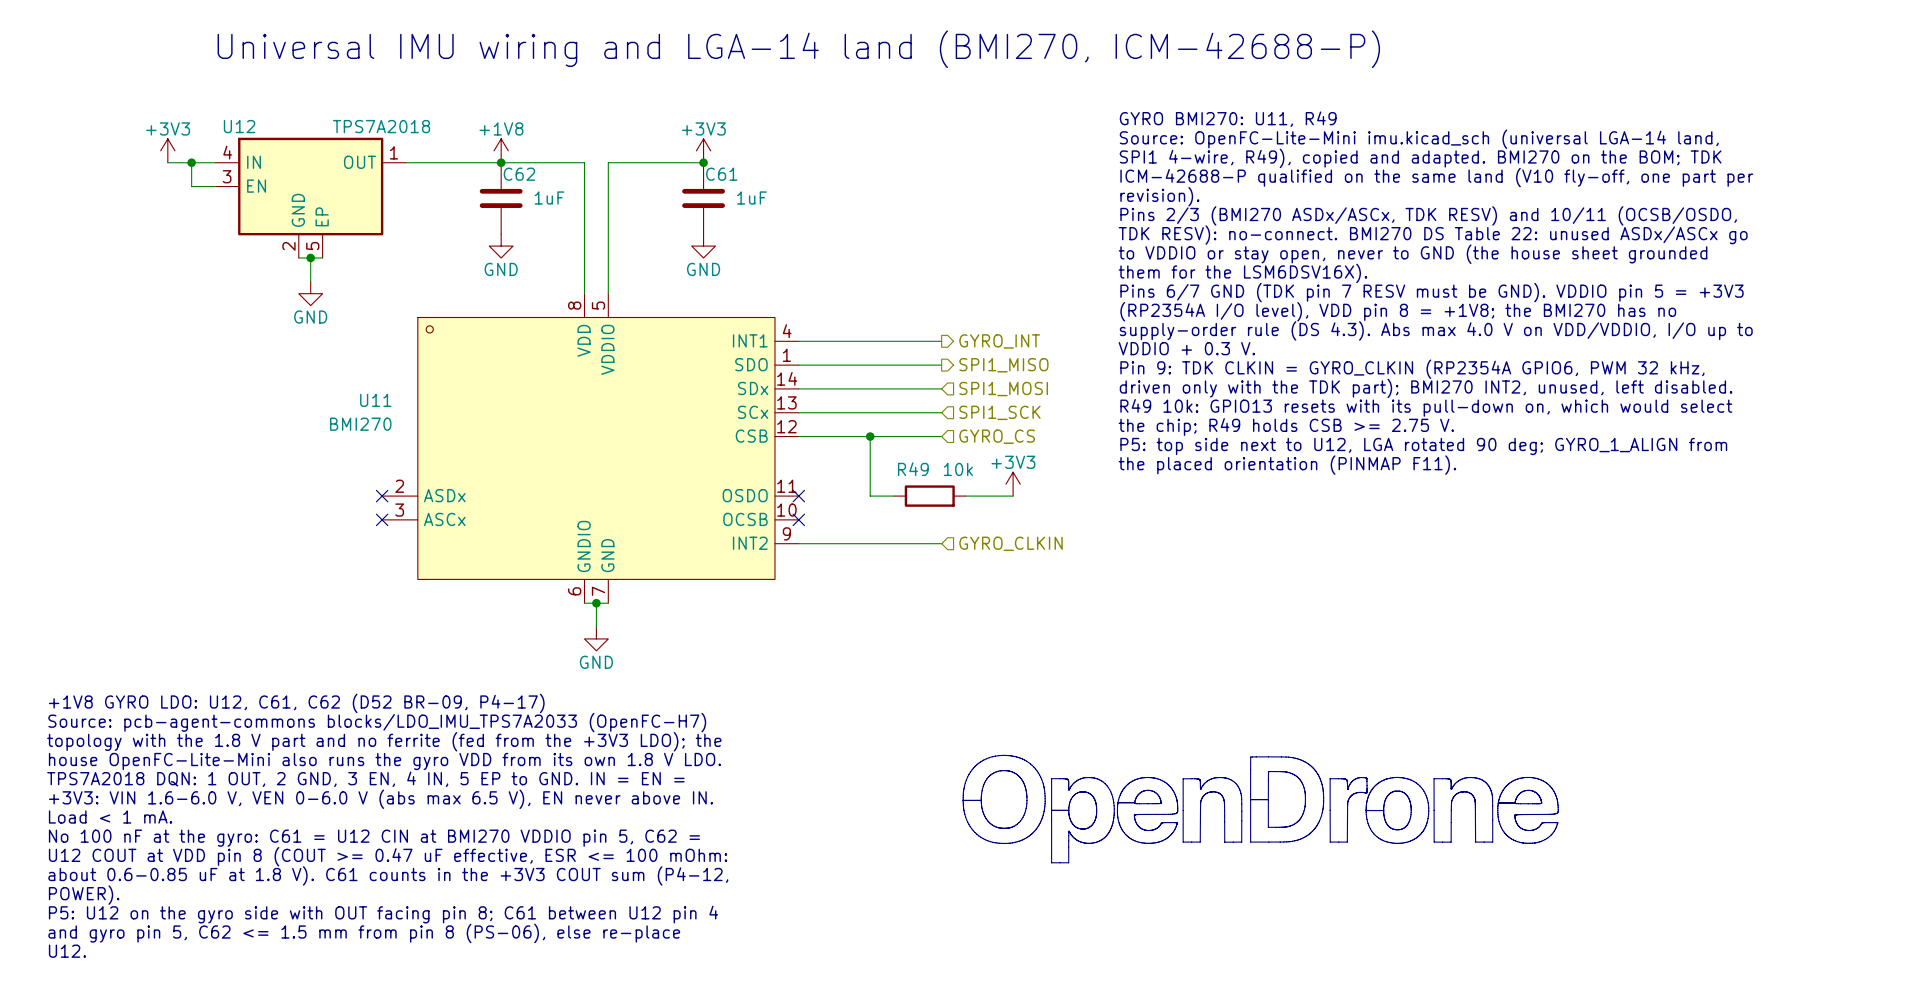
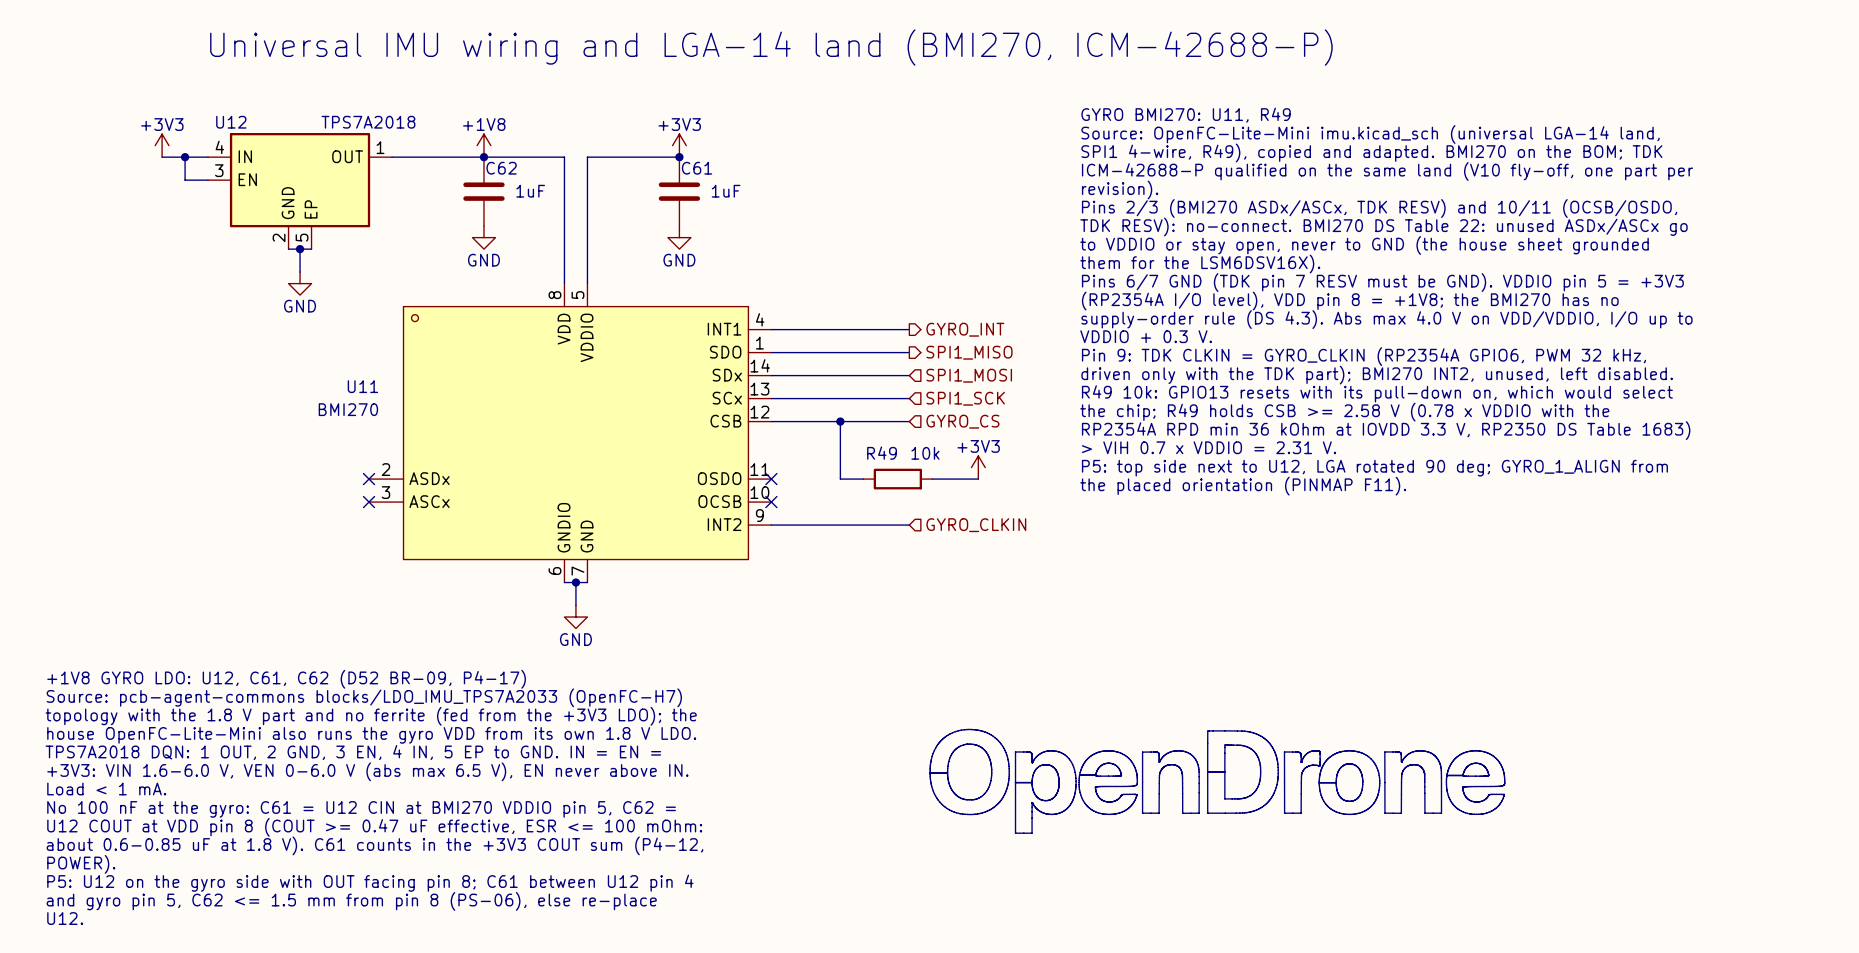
text: the chip; R49 holds CSB >= 2.75 V. (1286, 427) -> the chip; R49 holds CSB >= 2.58 V (0.78 x VDDIO with the (1344, 412)
text: P5: top side next to U12, LGA rotated 90 deg; GYRO_1_ALIGN from (1423, 446) -> RP2354A RPD min 36 kOhm at IOVDD 3.3 V, RP2350 DS Table 1683) (1386, 430)
text: the placed orientation (PINMAP F11). (1287, 465) -> > VIH 0.7 x VDDIO = 2.31 V. (1209, 447)
text: none -> P5: top side next to U12, LGA rotated 90 deg; GYRO_1_ALIGN from (1374, 468)
text: none -> the placed orientation (PINMAP F11). (1243, 486)

